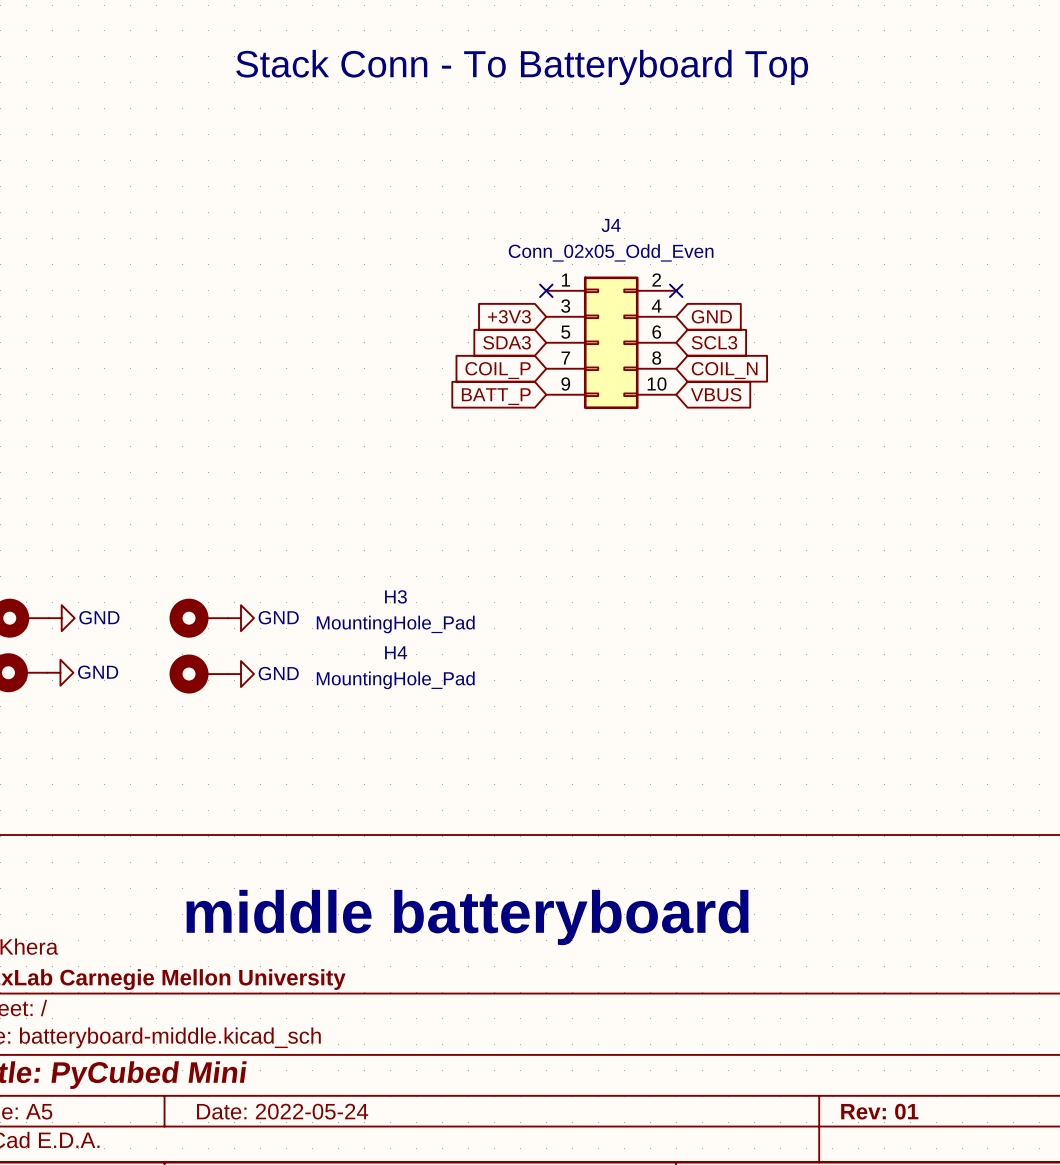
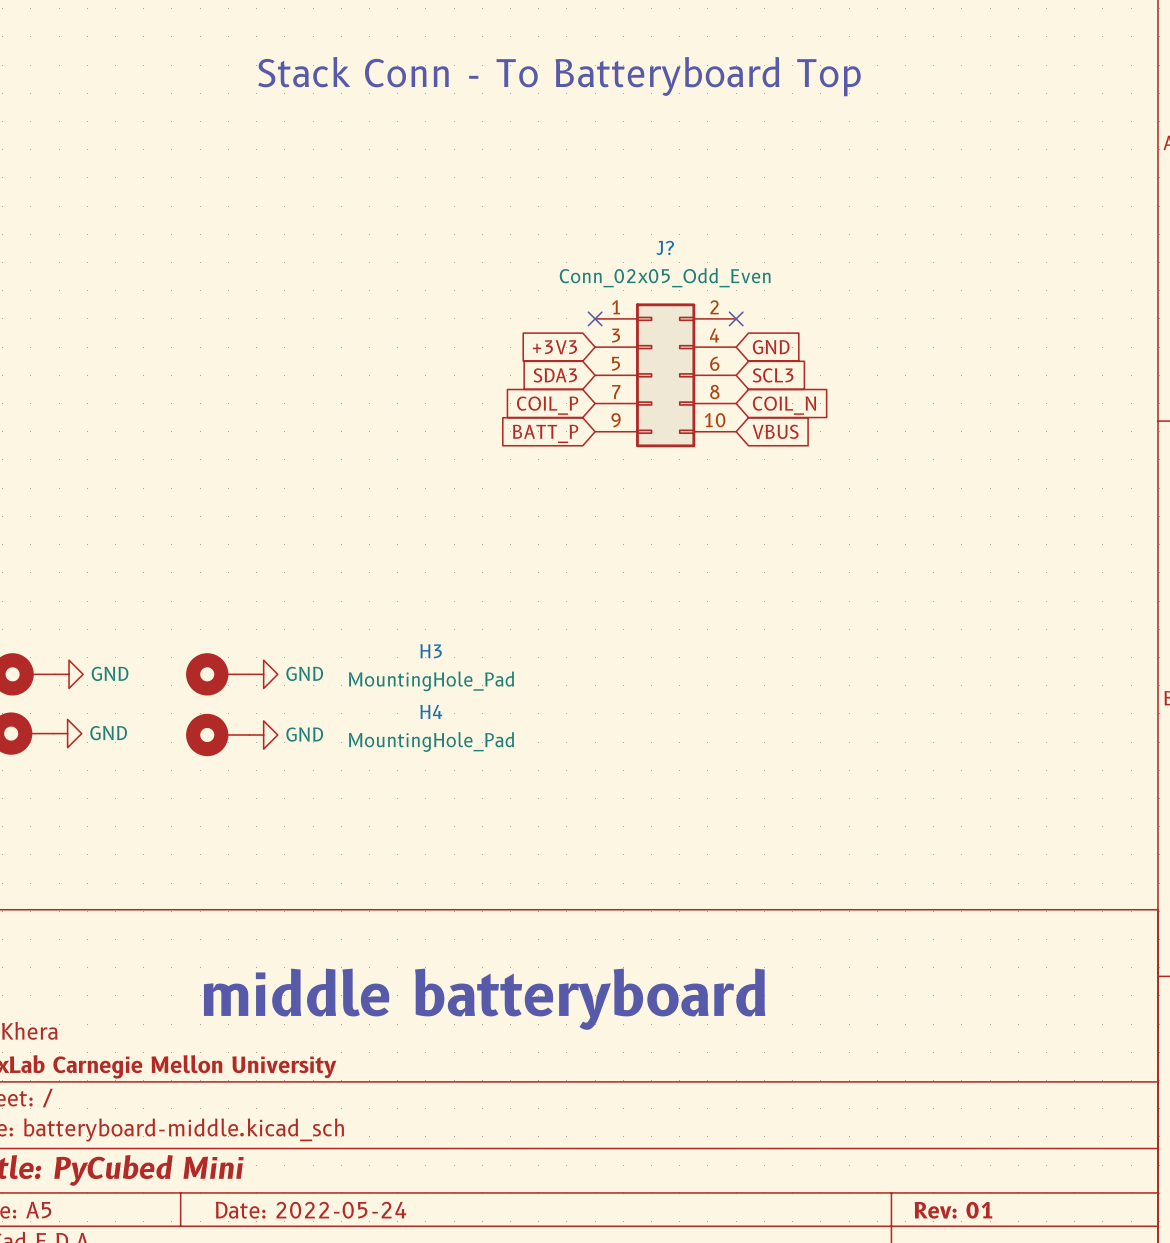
J4 name: J4 (611, 225) -> J? (665, 247)

